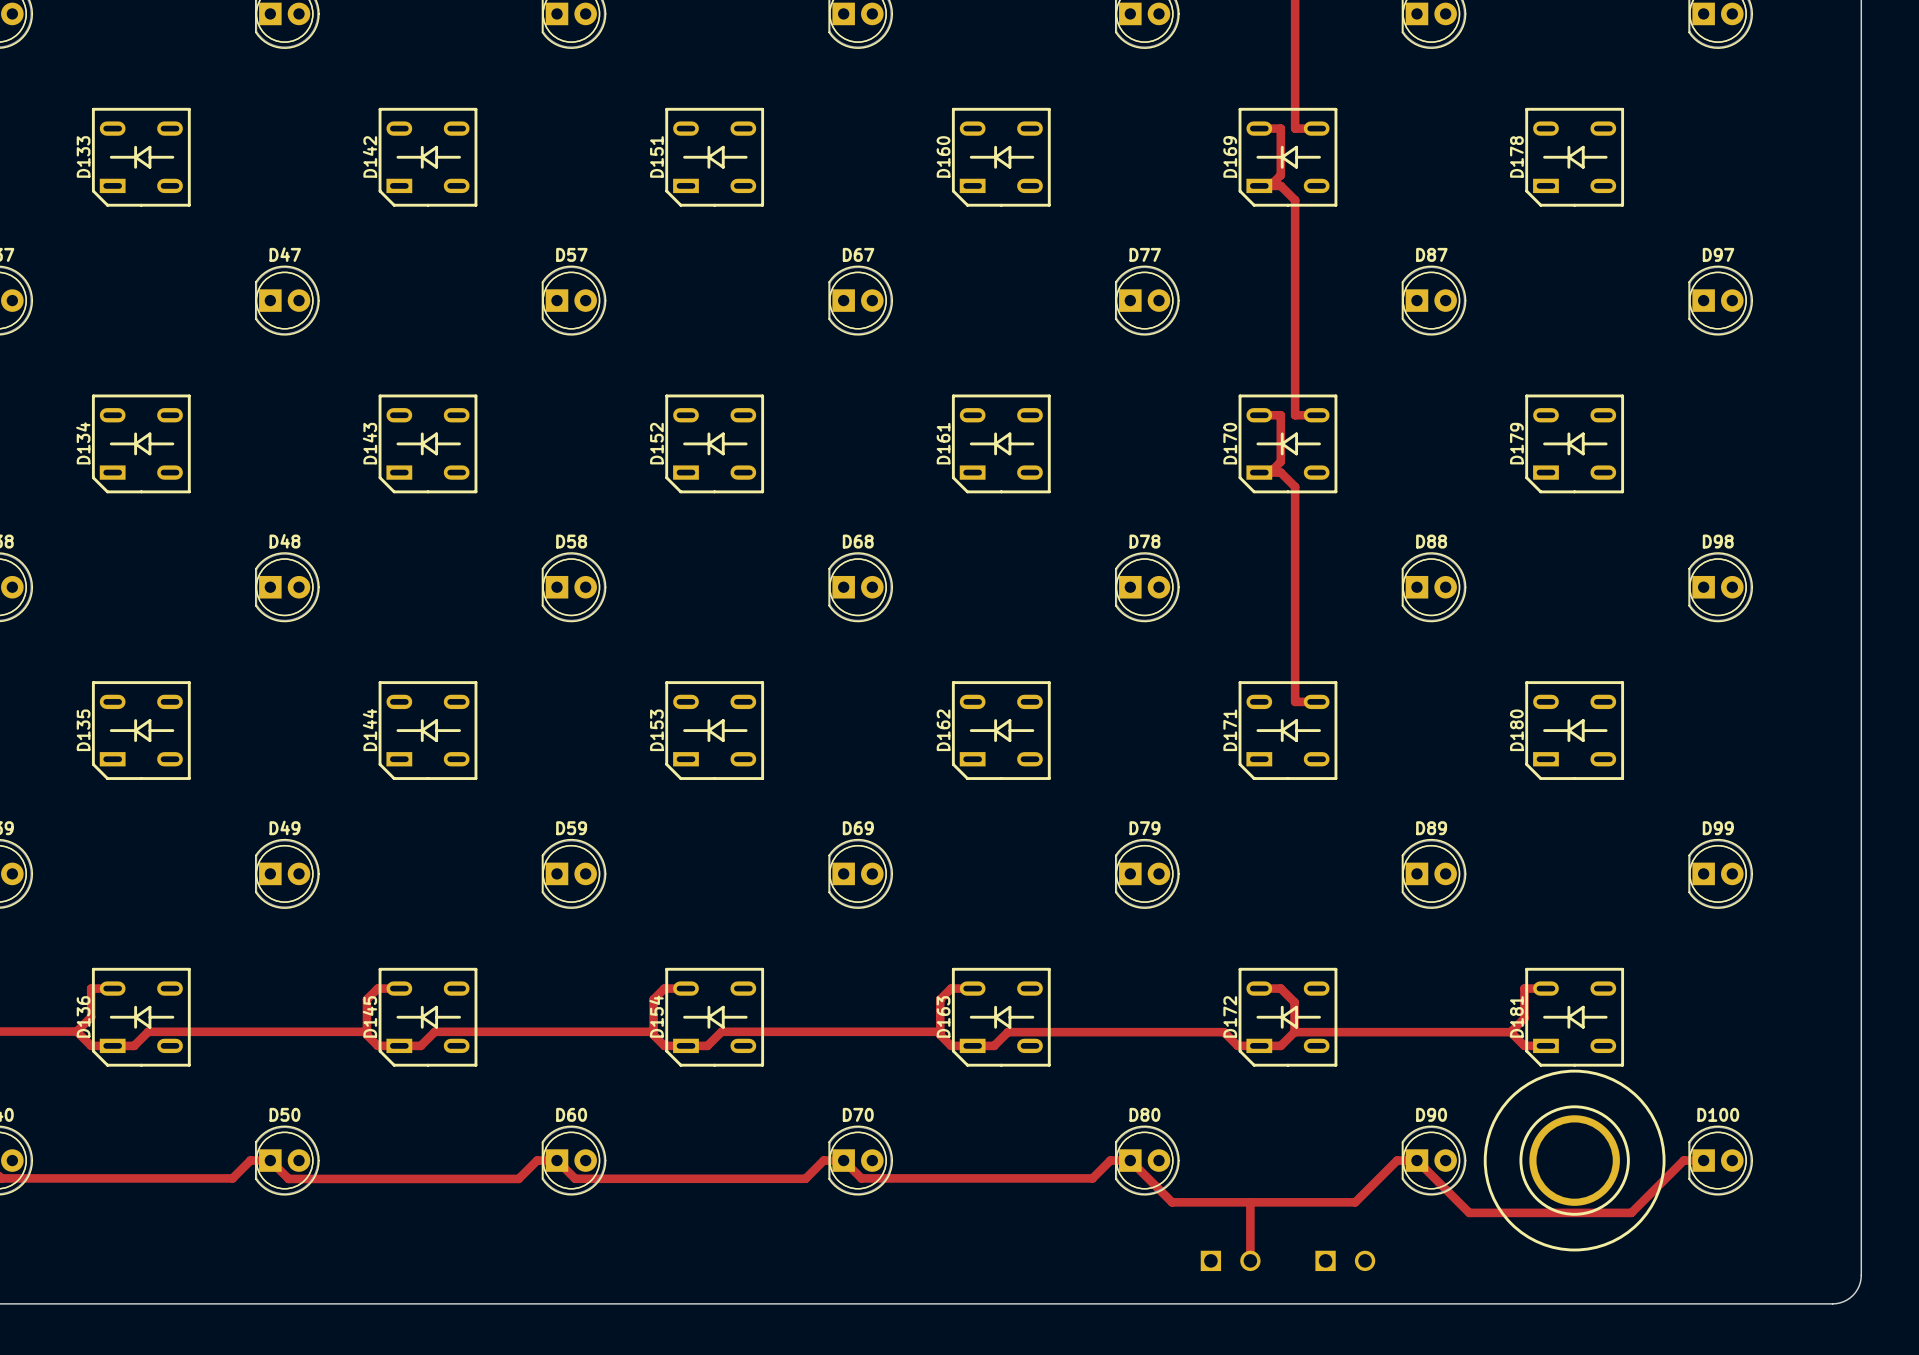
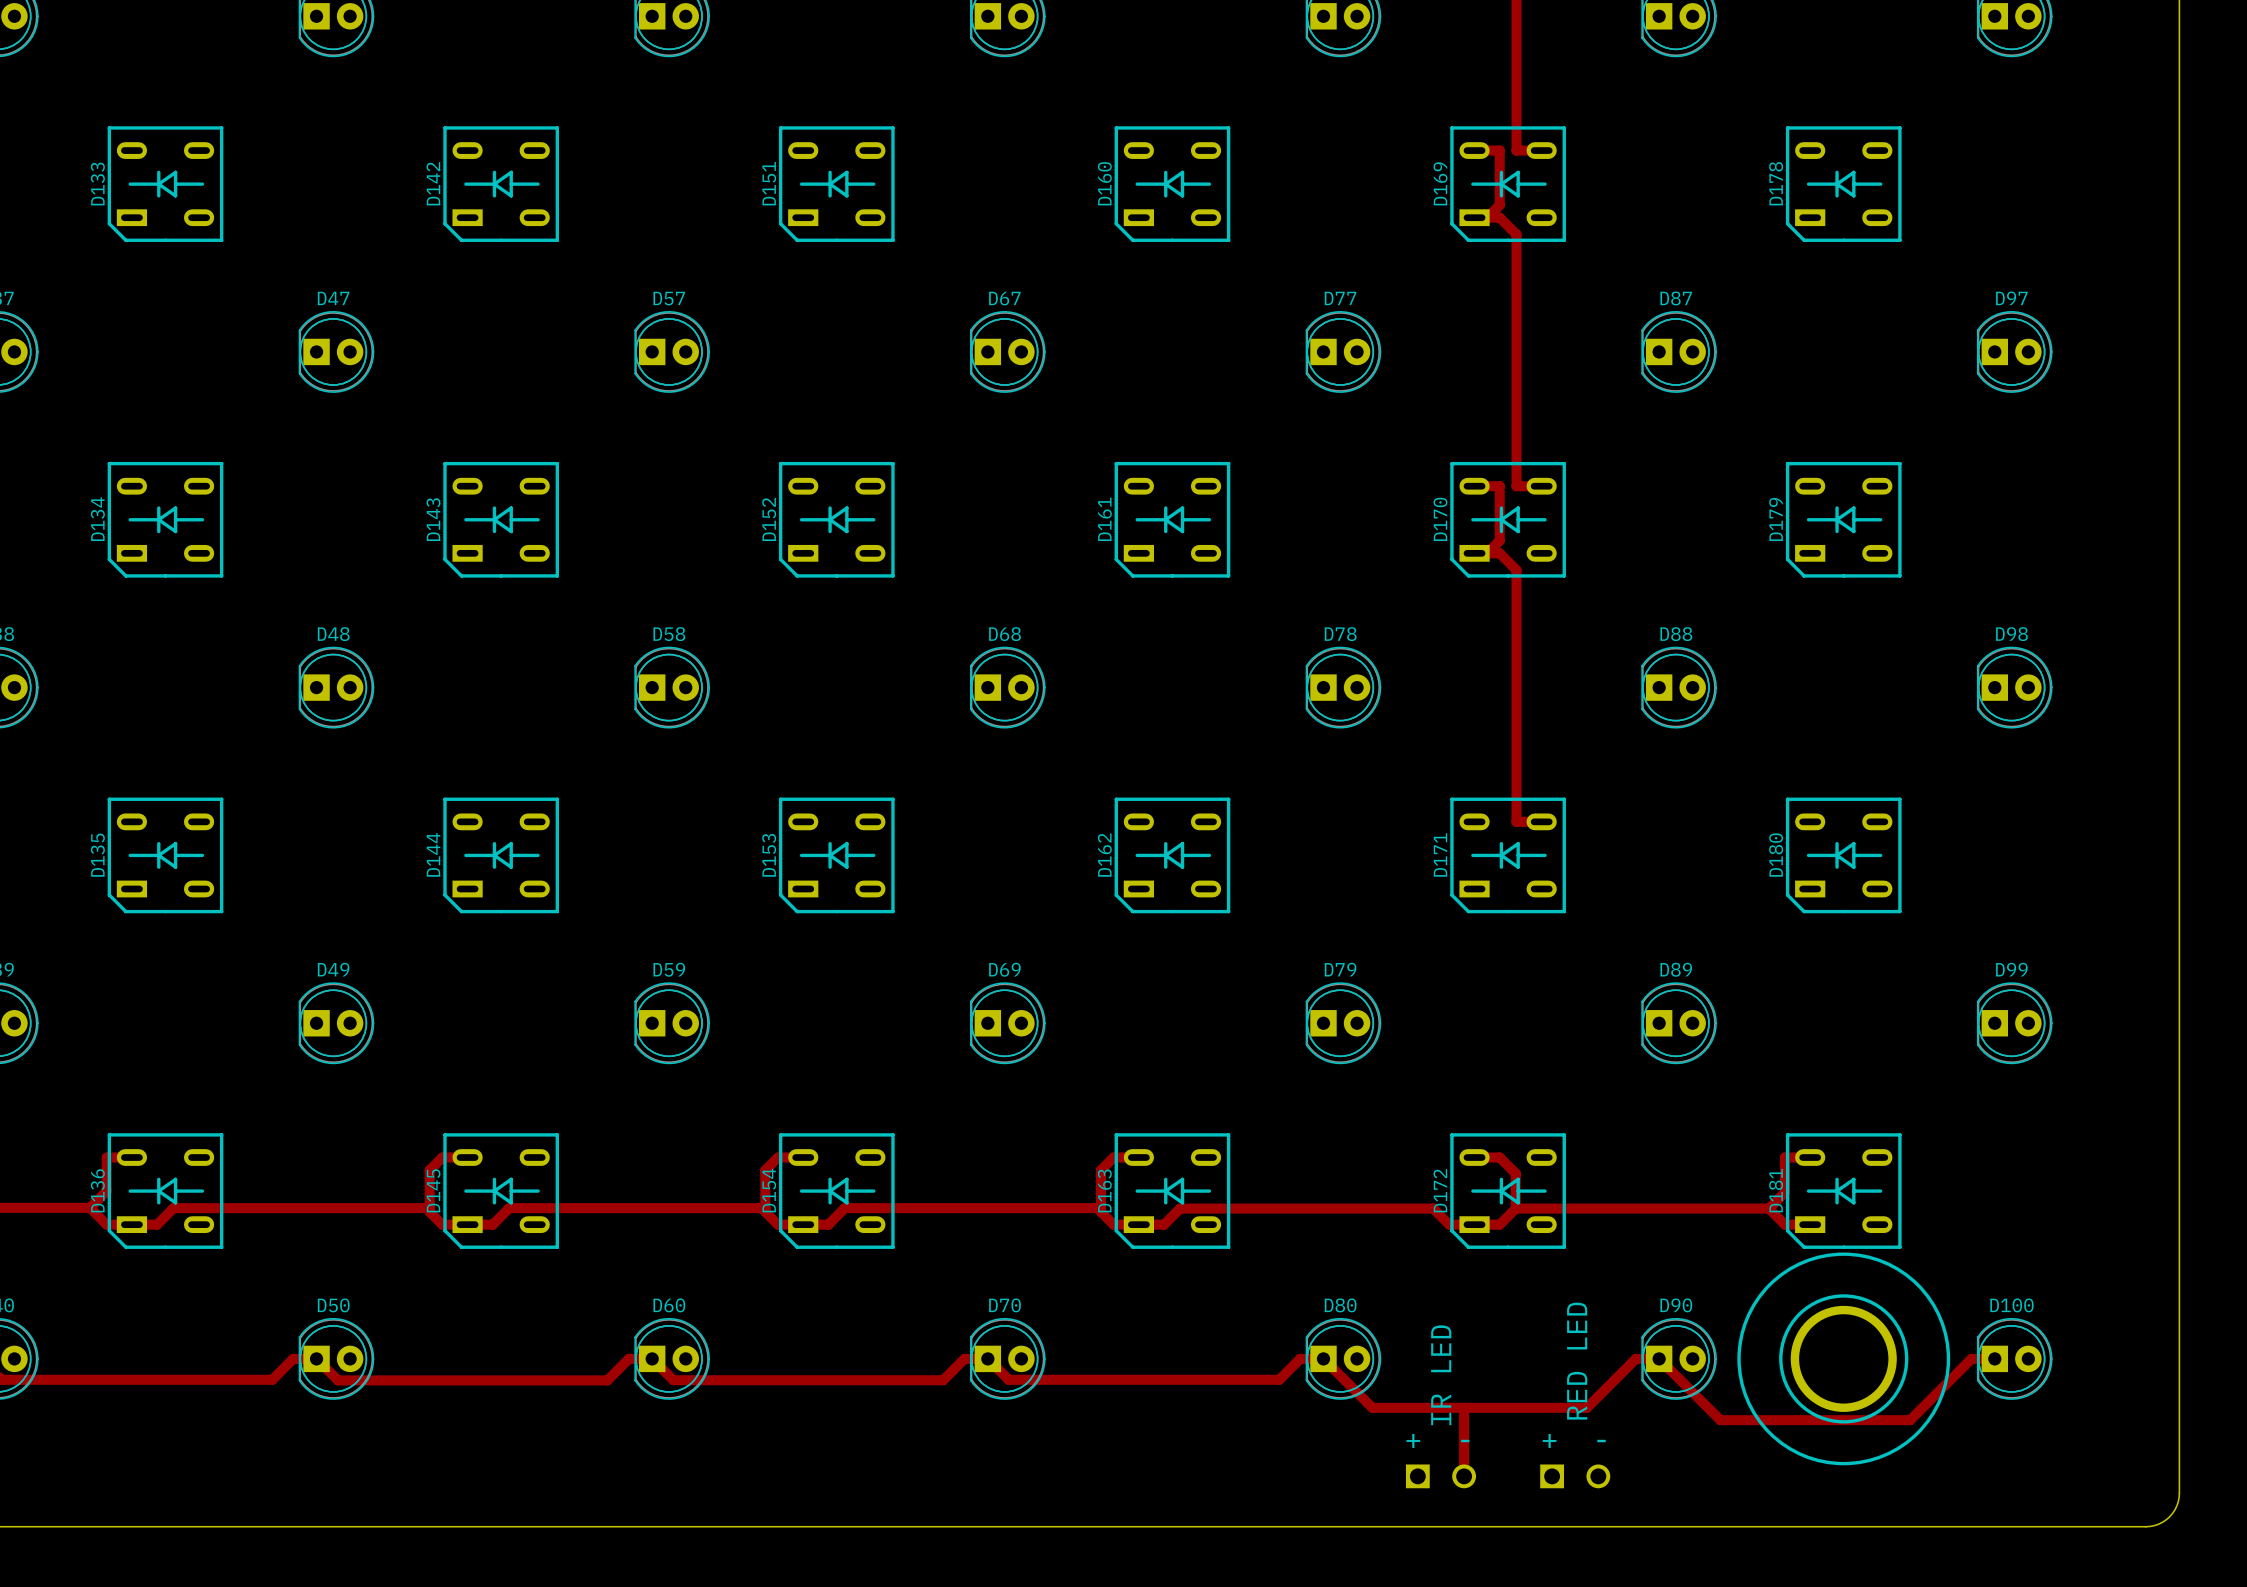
text: none -> RED LED (1577, 1361)
text: none -> IR LED (1441, 1375)
text: none -> + - (1437, 1440)
text: none -> + - (1574, 1440)

